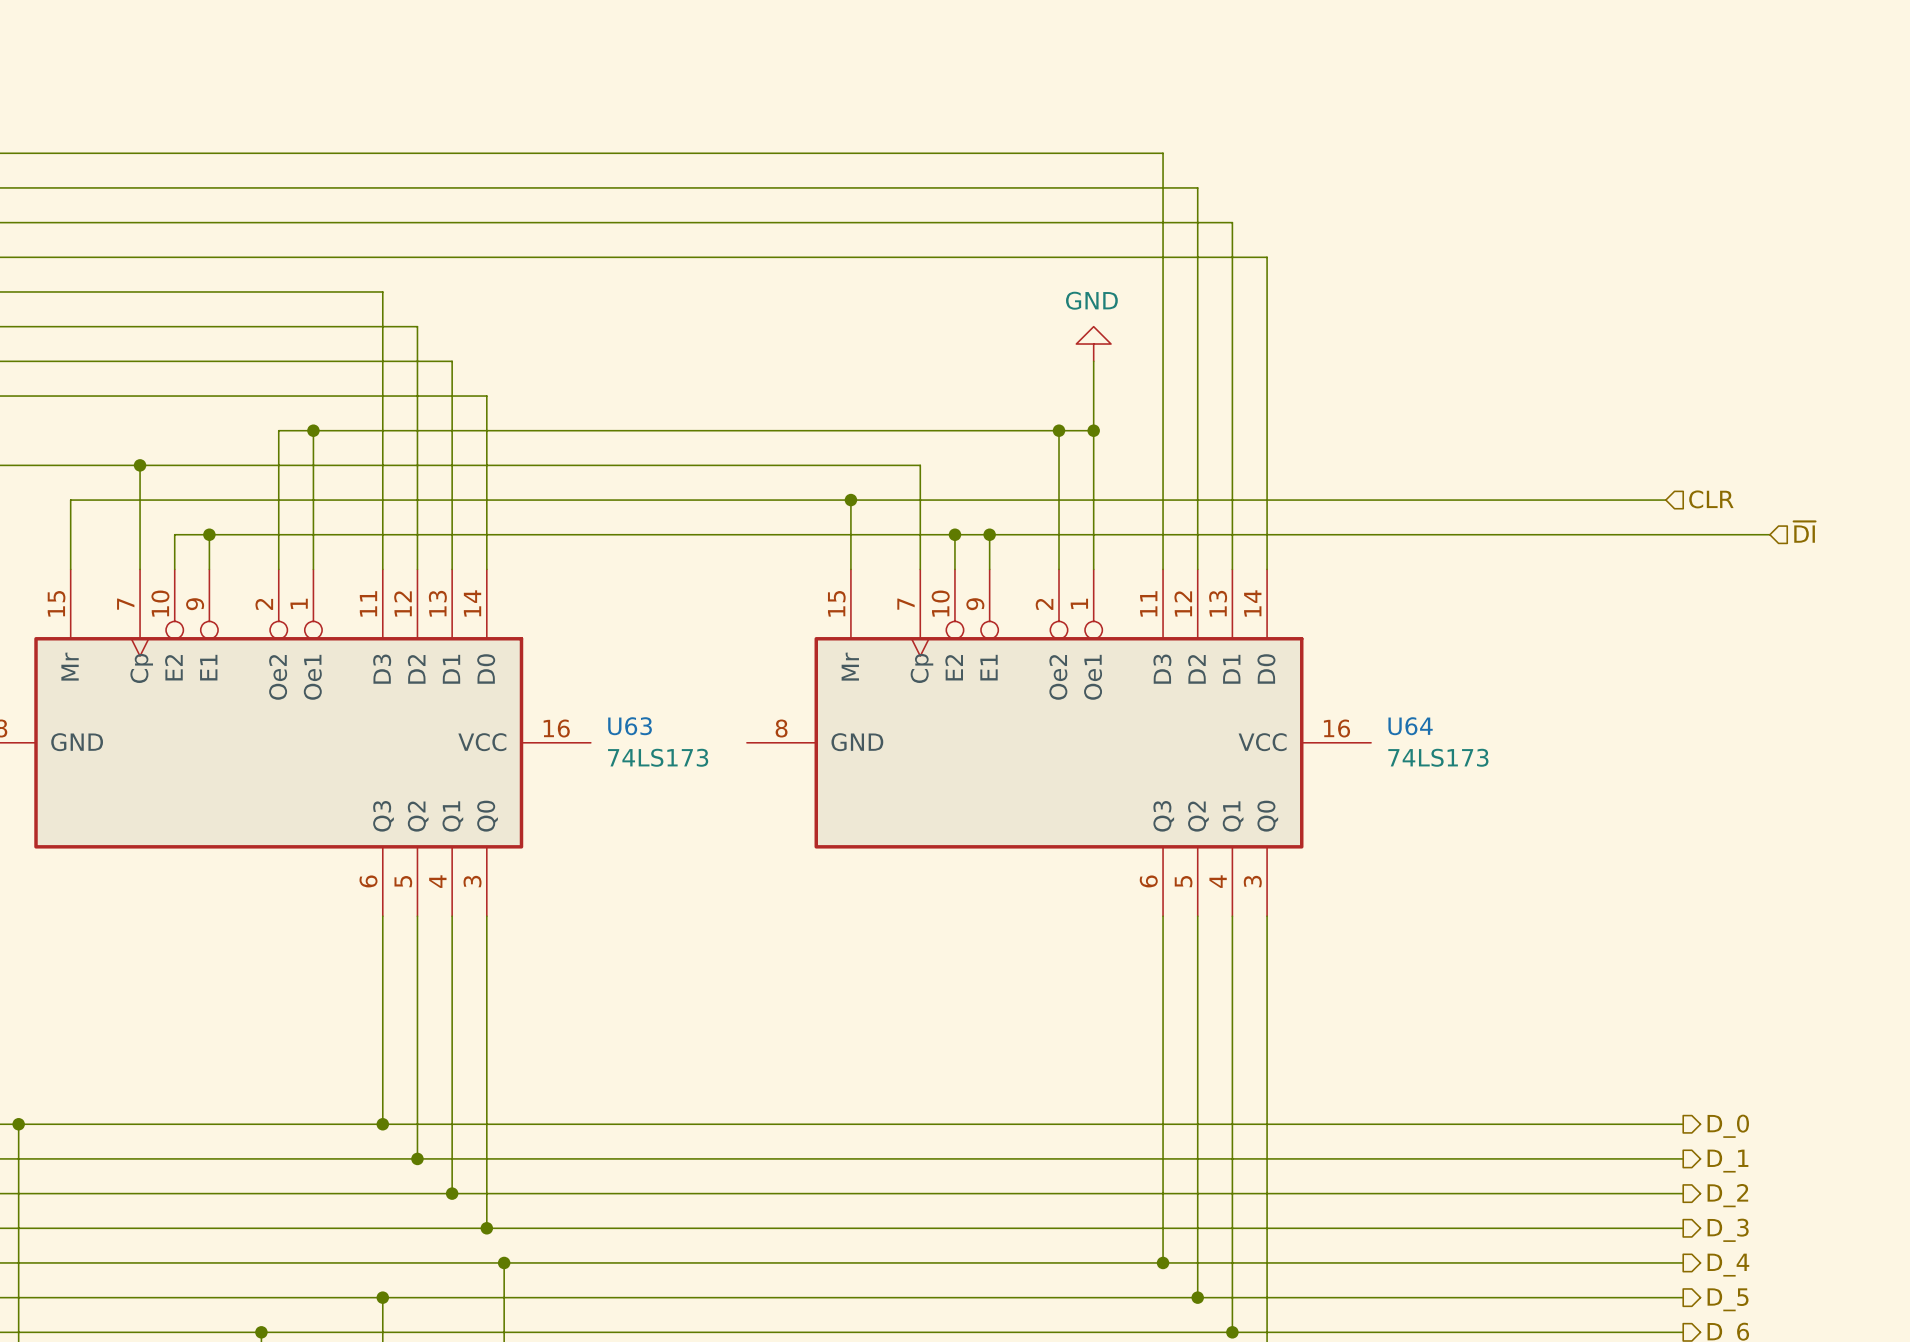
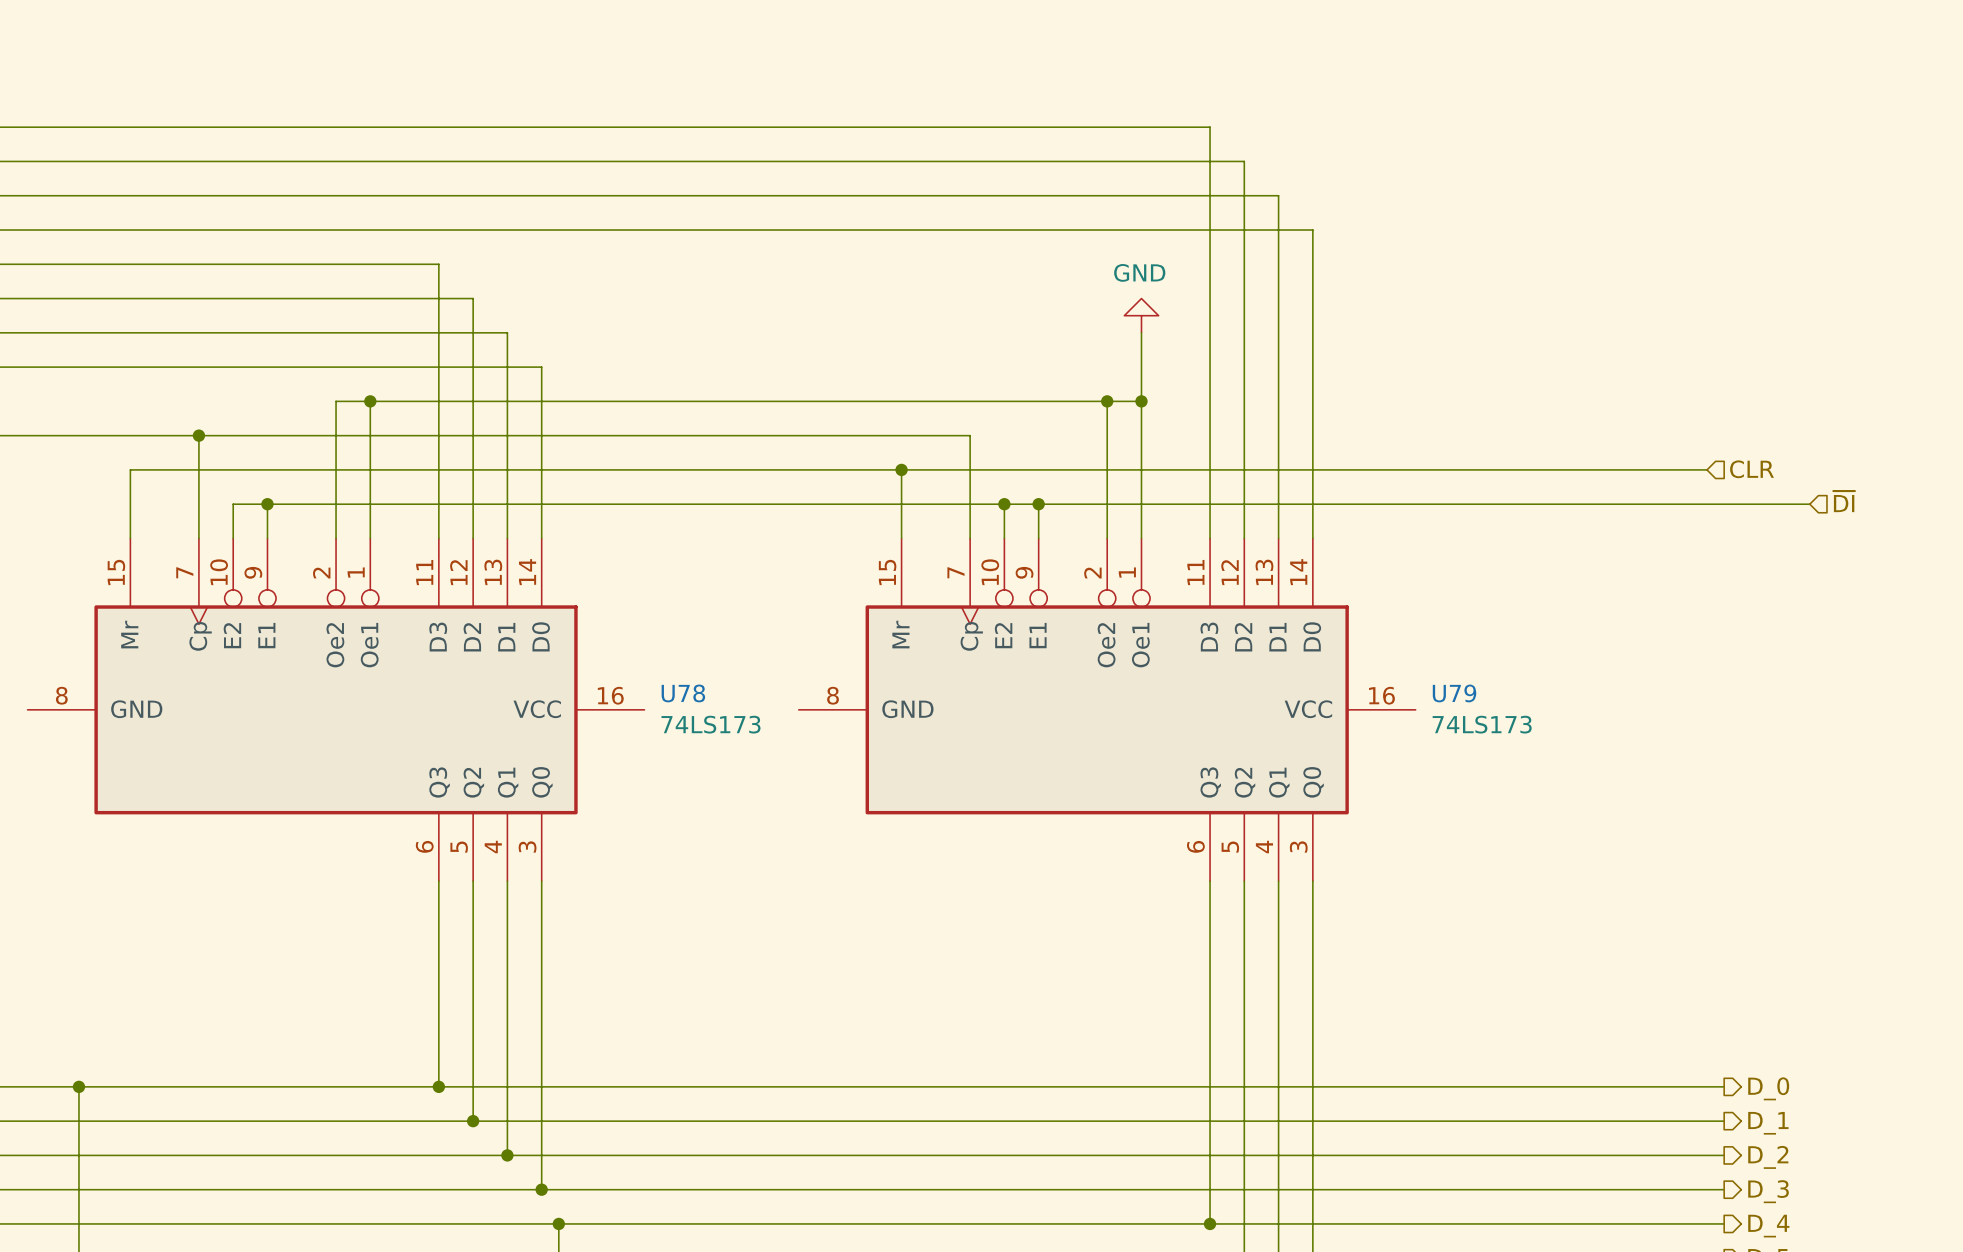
U63 name: U63 (630, 726) -> U78 (683, 693)
U64 name: U64 (1410, 726) -> U79 (1454, 693)

